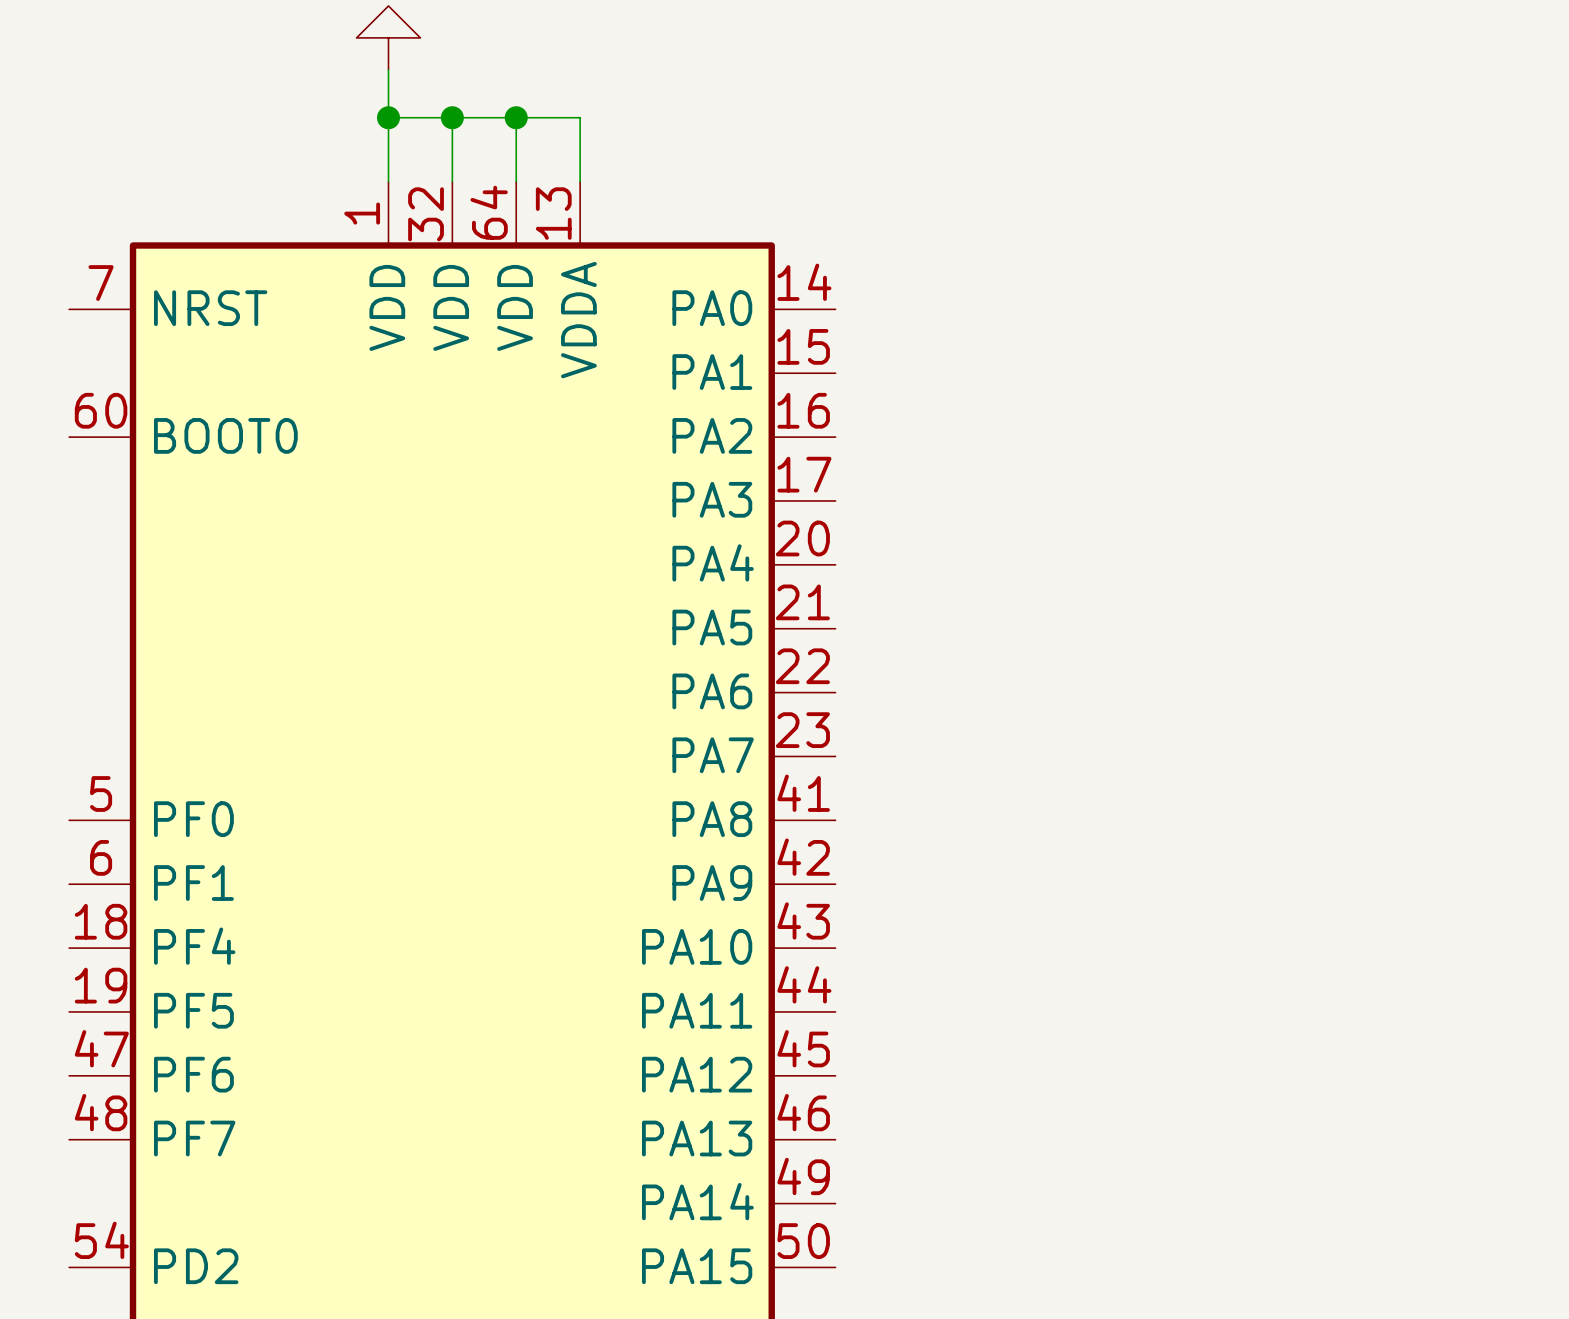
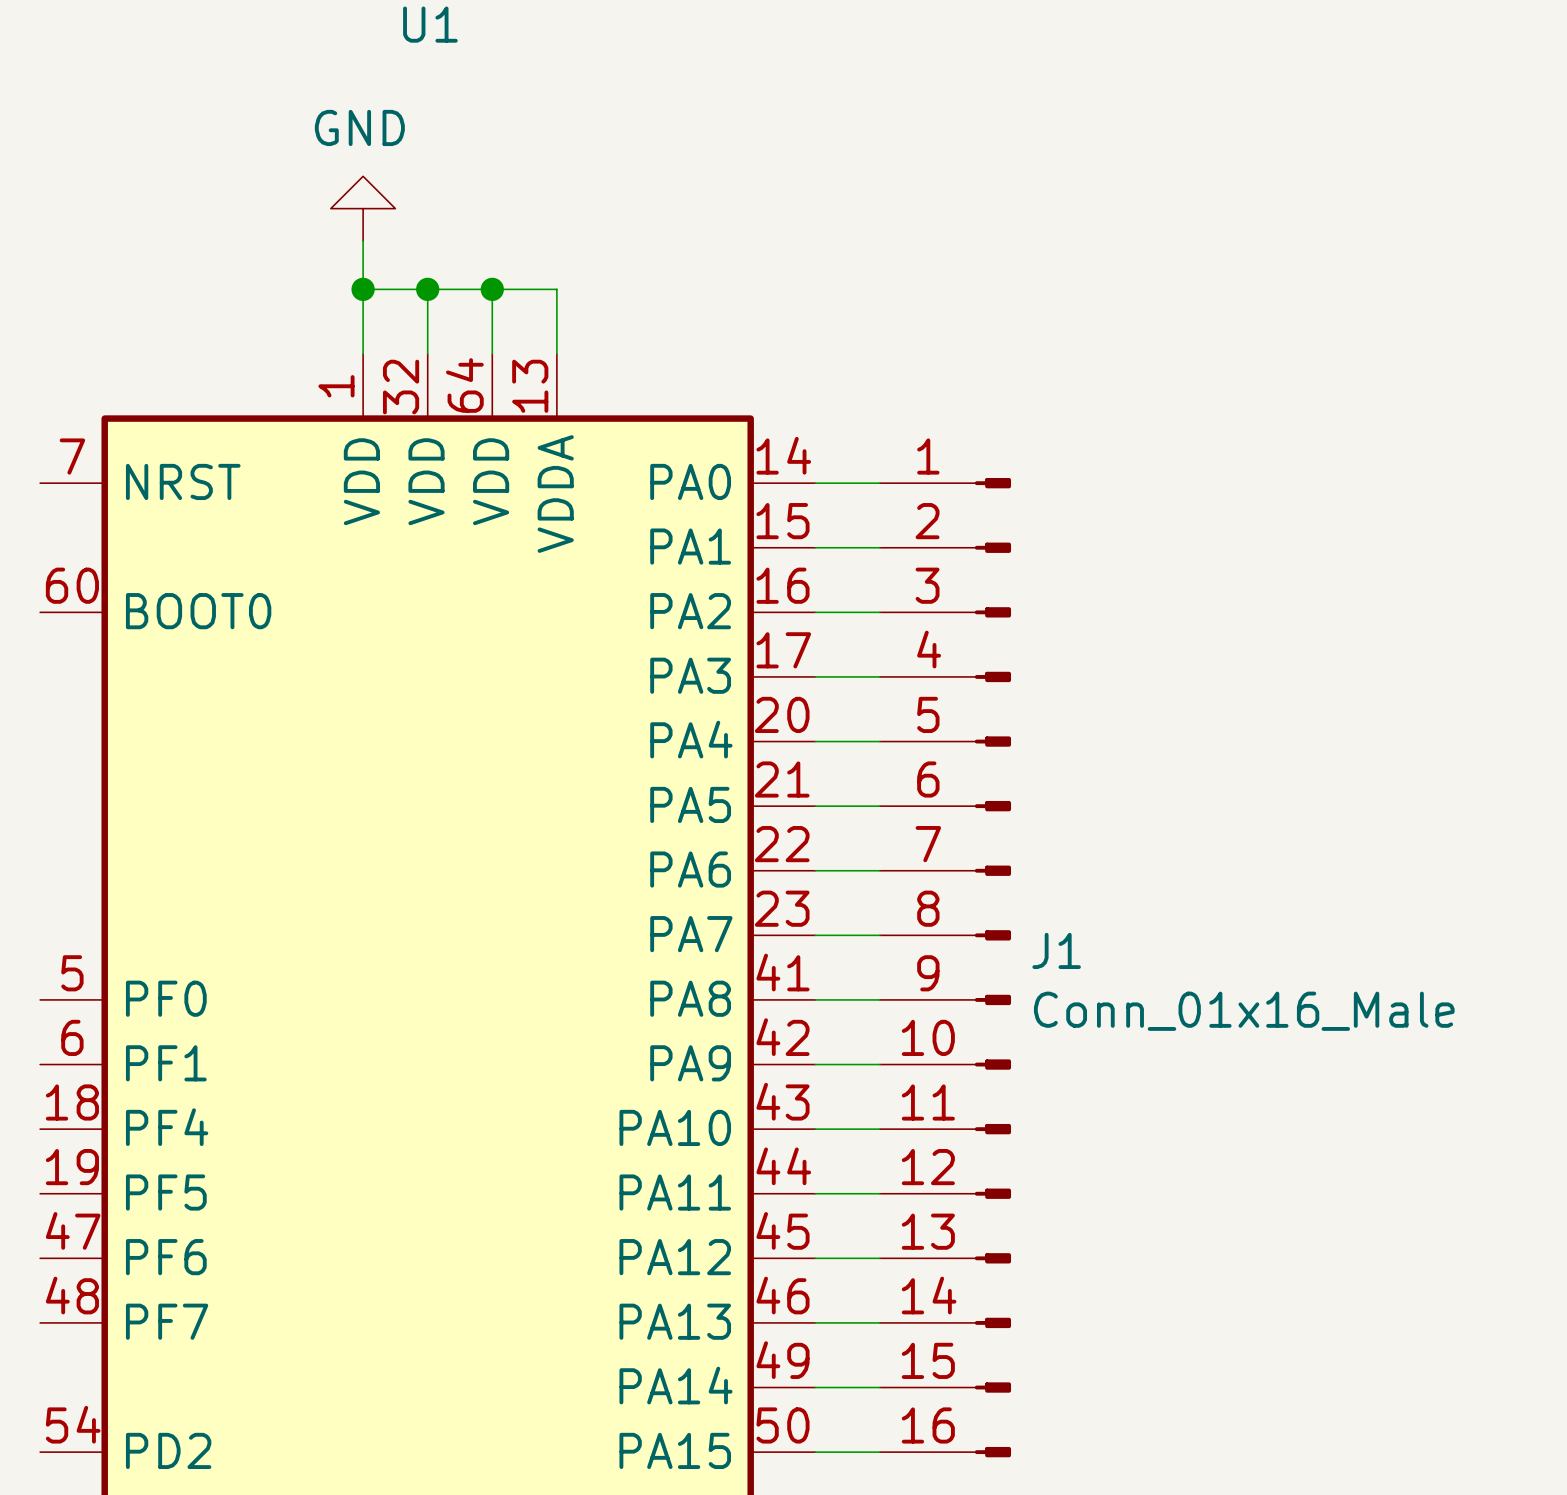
wire: none -> (815, 483) (879, 483)
wire: none -> (815, 547) (879, 547)
wire: none -> (815, 612) (879, 612)
wire: none -> (815, 676) (879, 676)
wire: none -> (815, 741) (879, 741)
wire: none -> (815, 806) (879, 806)
wire: none -> (815, 870) (879, 870)
wire: none -> (815, 935) (879, 935)
J1: none -> Conn_01x16_Male (945, 967)
wire: none -> (815, 999) (879, 999)
wire: none -> (815, 1064) (879, 1064)
wire: none -> (815, 1129) (879, 1129)
wire: none -> (815, 1193) (879, 1193)
wire: none -> (815, 1258) (879, 1258)
wire: none -> (815, 1322) (879, 1322)
wire: none -> (815, 1387) (879, 1387)
wire: none -> (815, 1452) (879, 1452)

